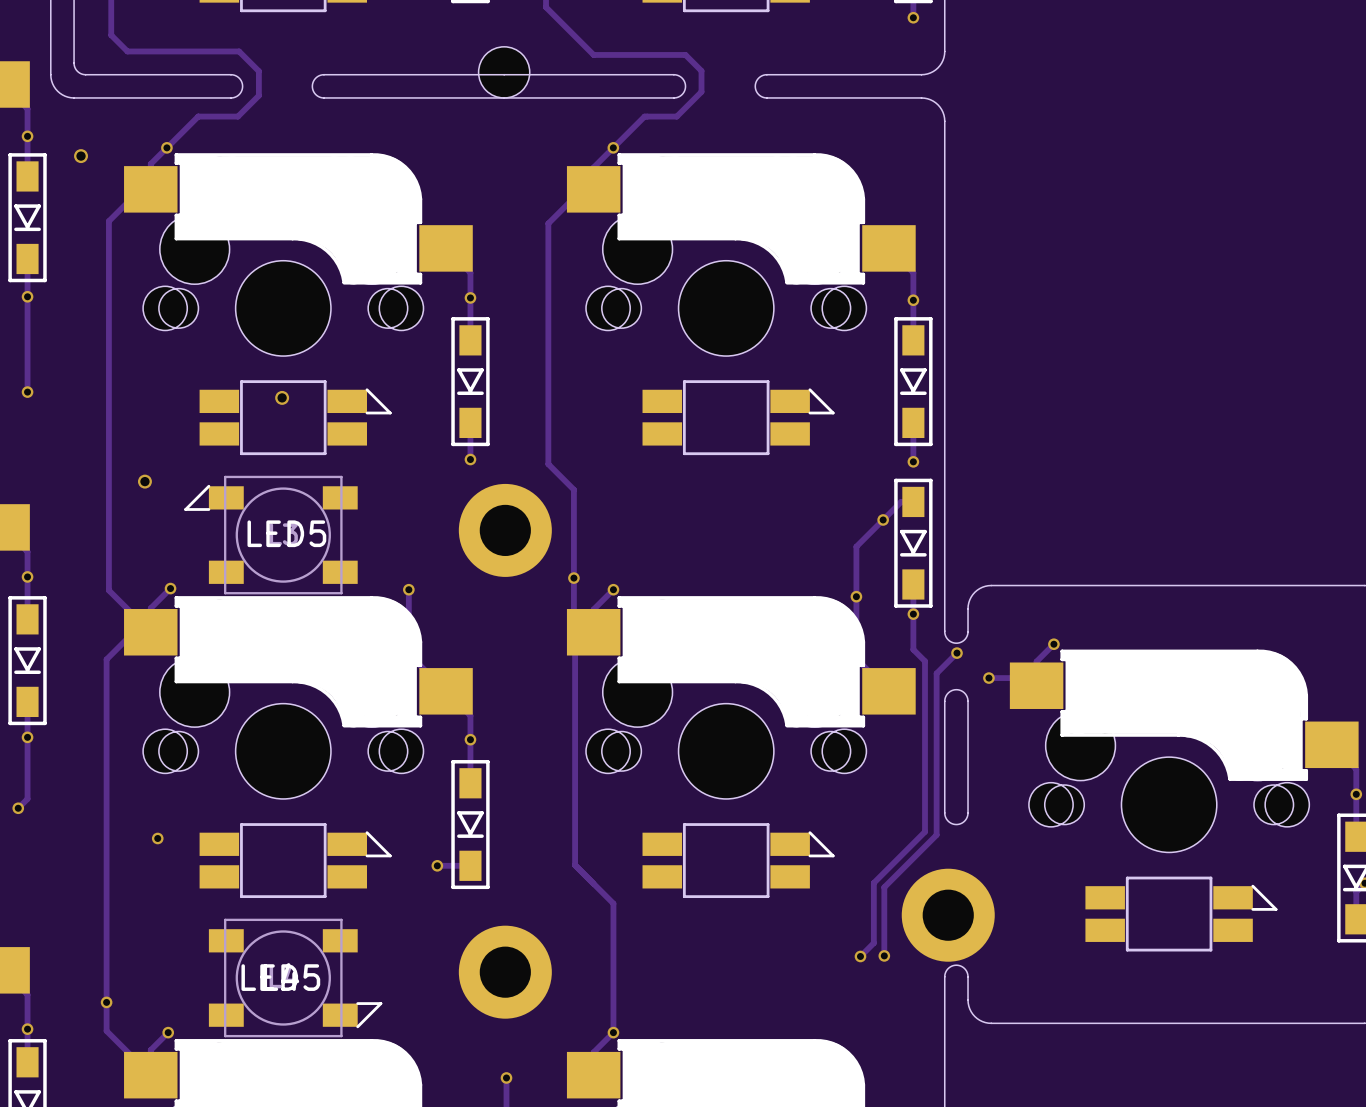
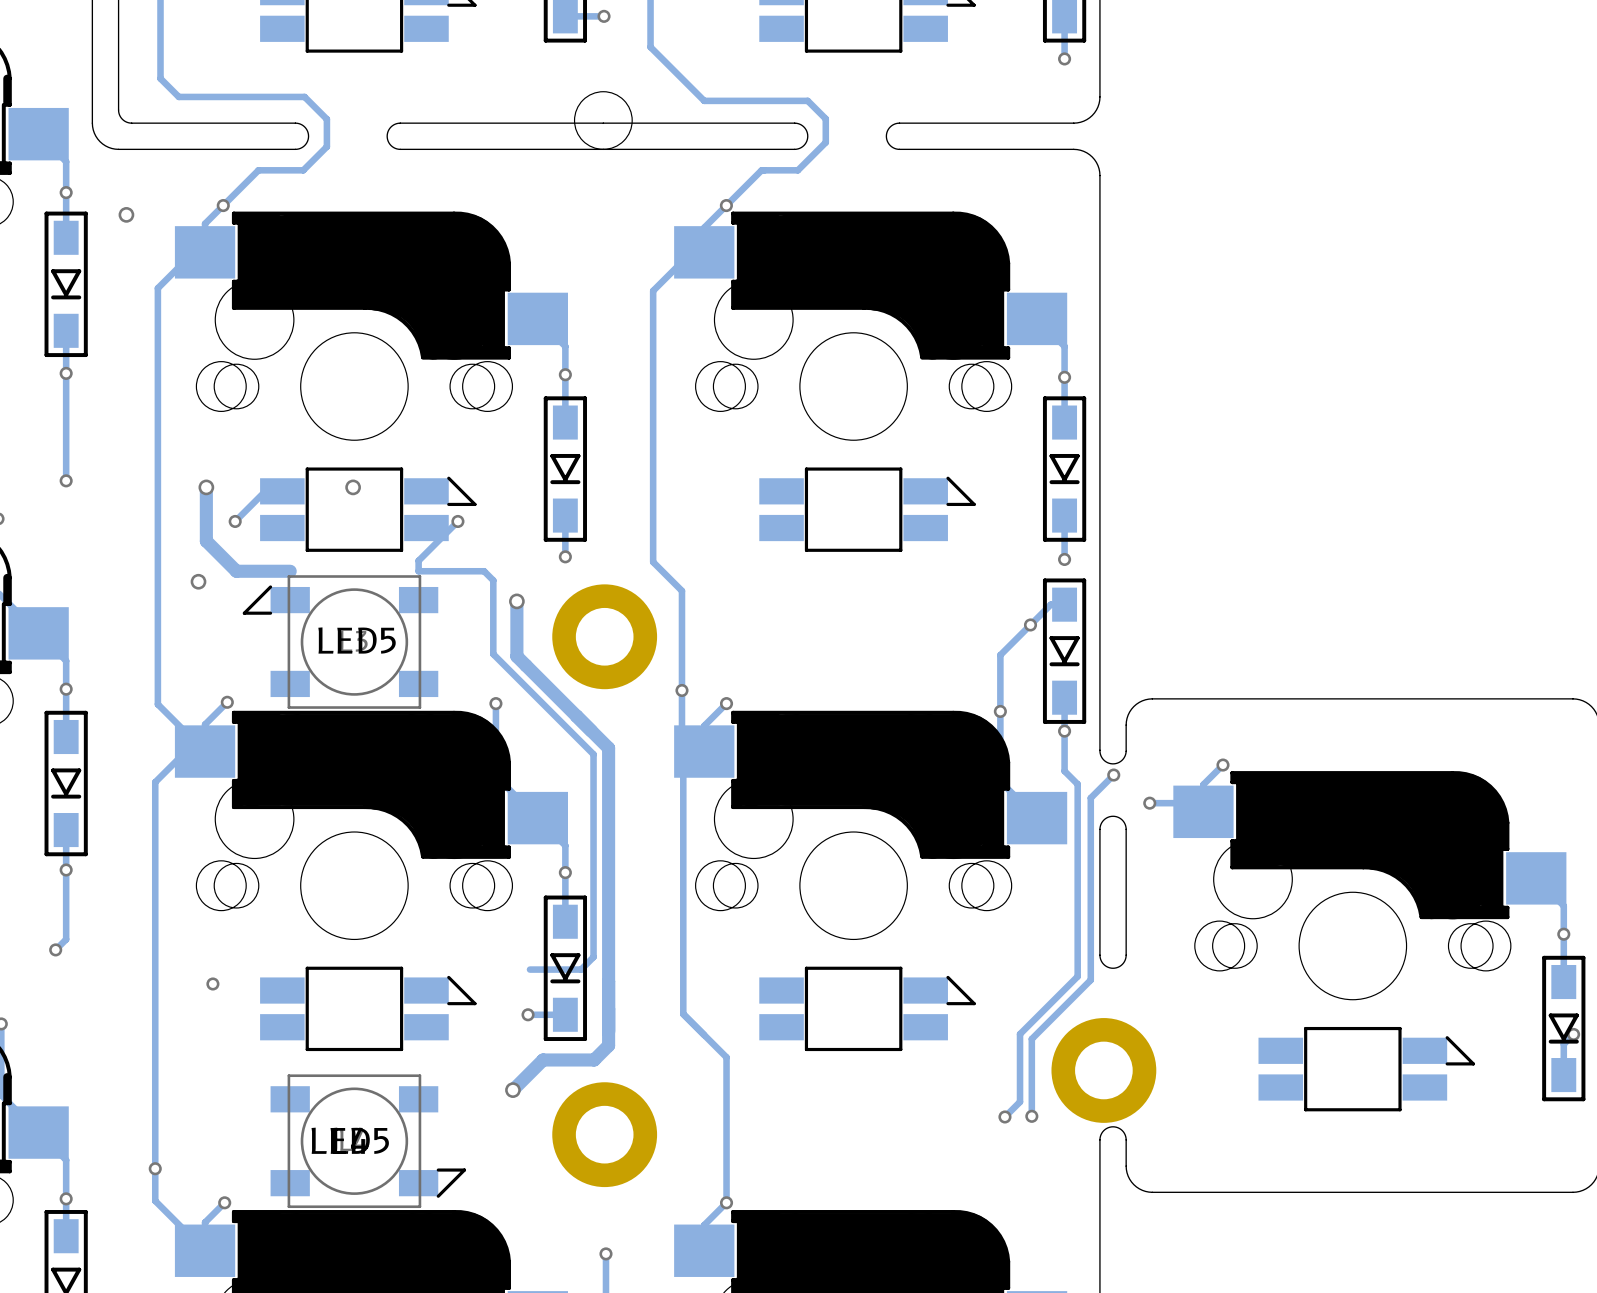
track: none -> (206, 487) (206, 541) (236, 571) (290, 571)
via: none -> (206, 487)
track: none -> (269, 487) (235, 521)
via: none -> (235, 521)
track: none -> (457, 521) (418, 560) (418, 571) (484, 571) (493, 580) (493, 654) (593, 754) (593, 957) (581, 969) (529, 969)
via: none -> (457, 521)
track: none -> (516, 601) (516, 656) (608, 748) (608, 1045) (594, 1059) (543, 1059) (512, 1090)
via: none -> (516, 601)
via: none -> (512, 1090)

